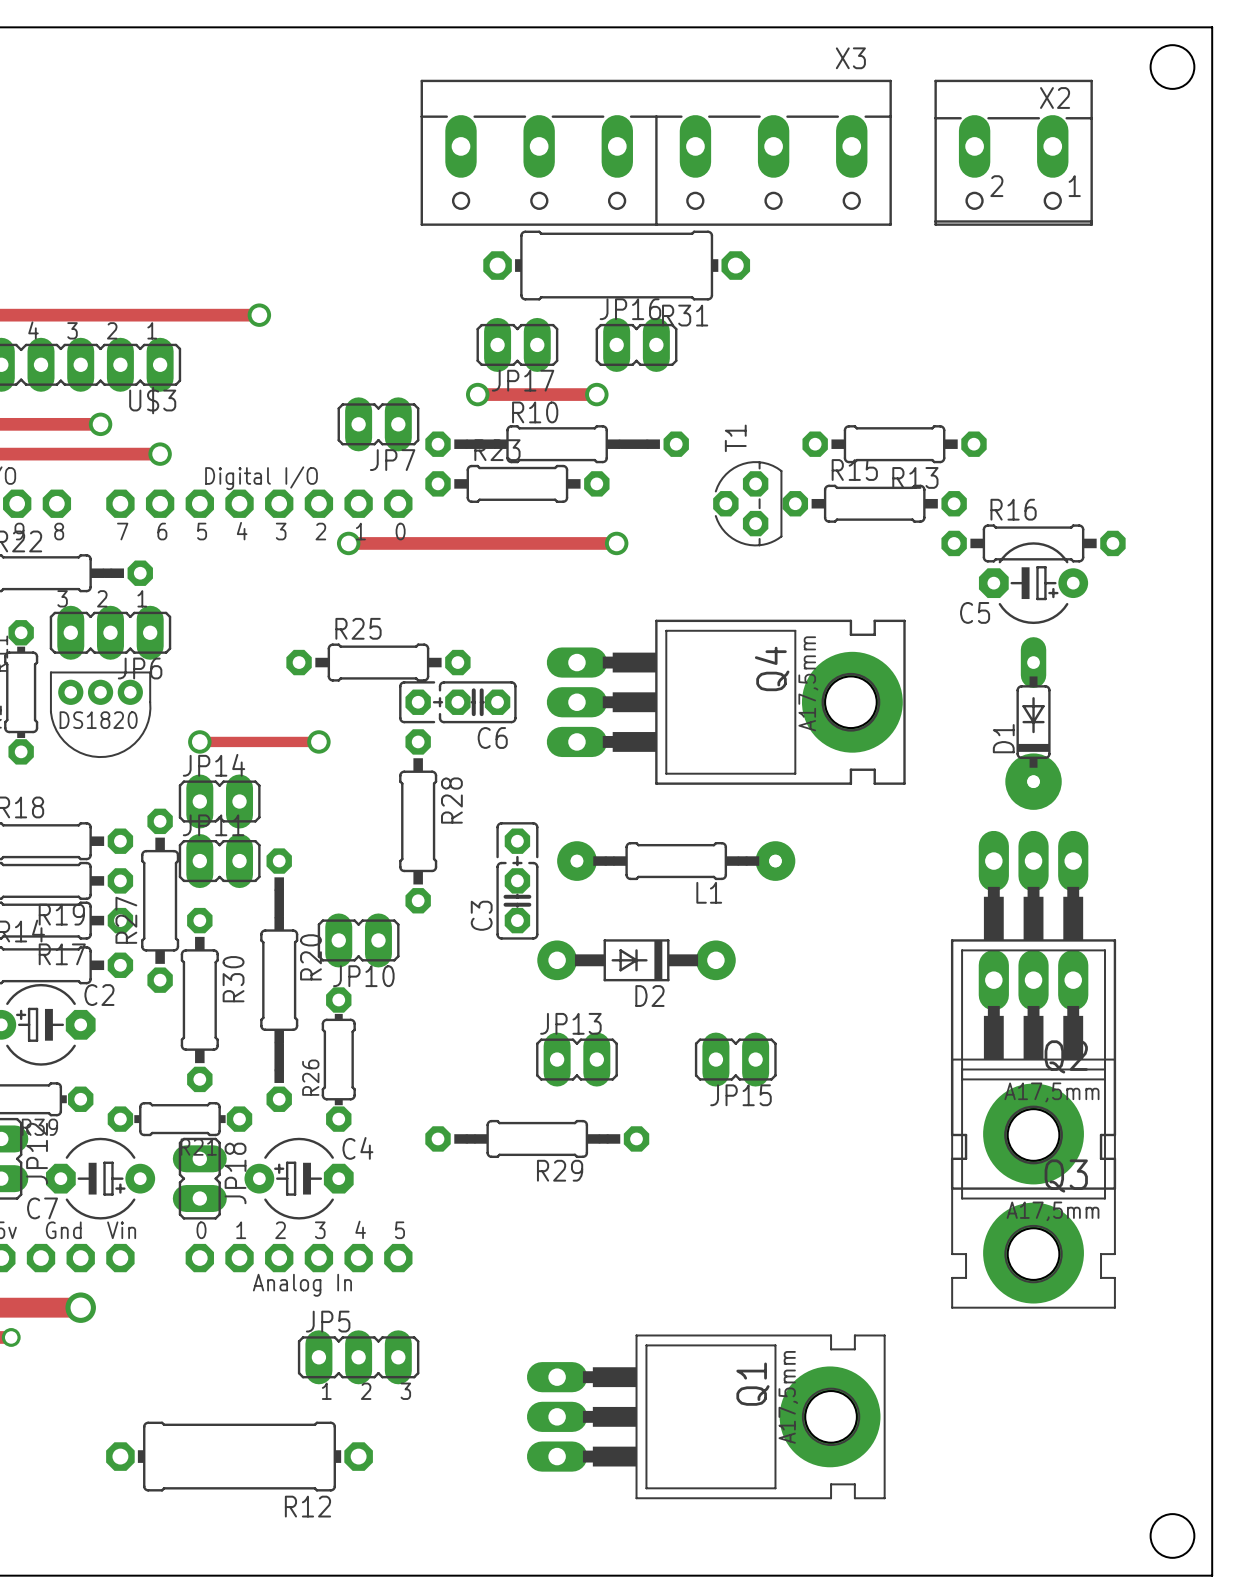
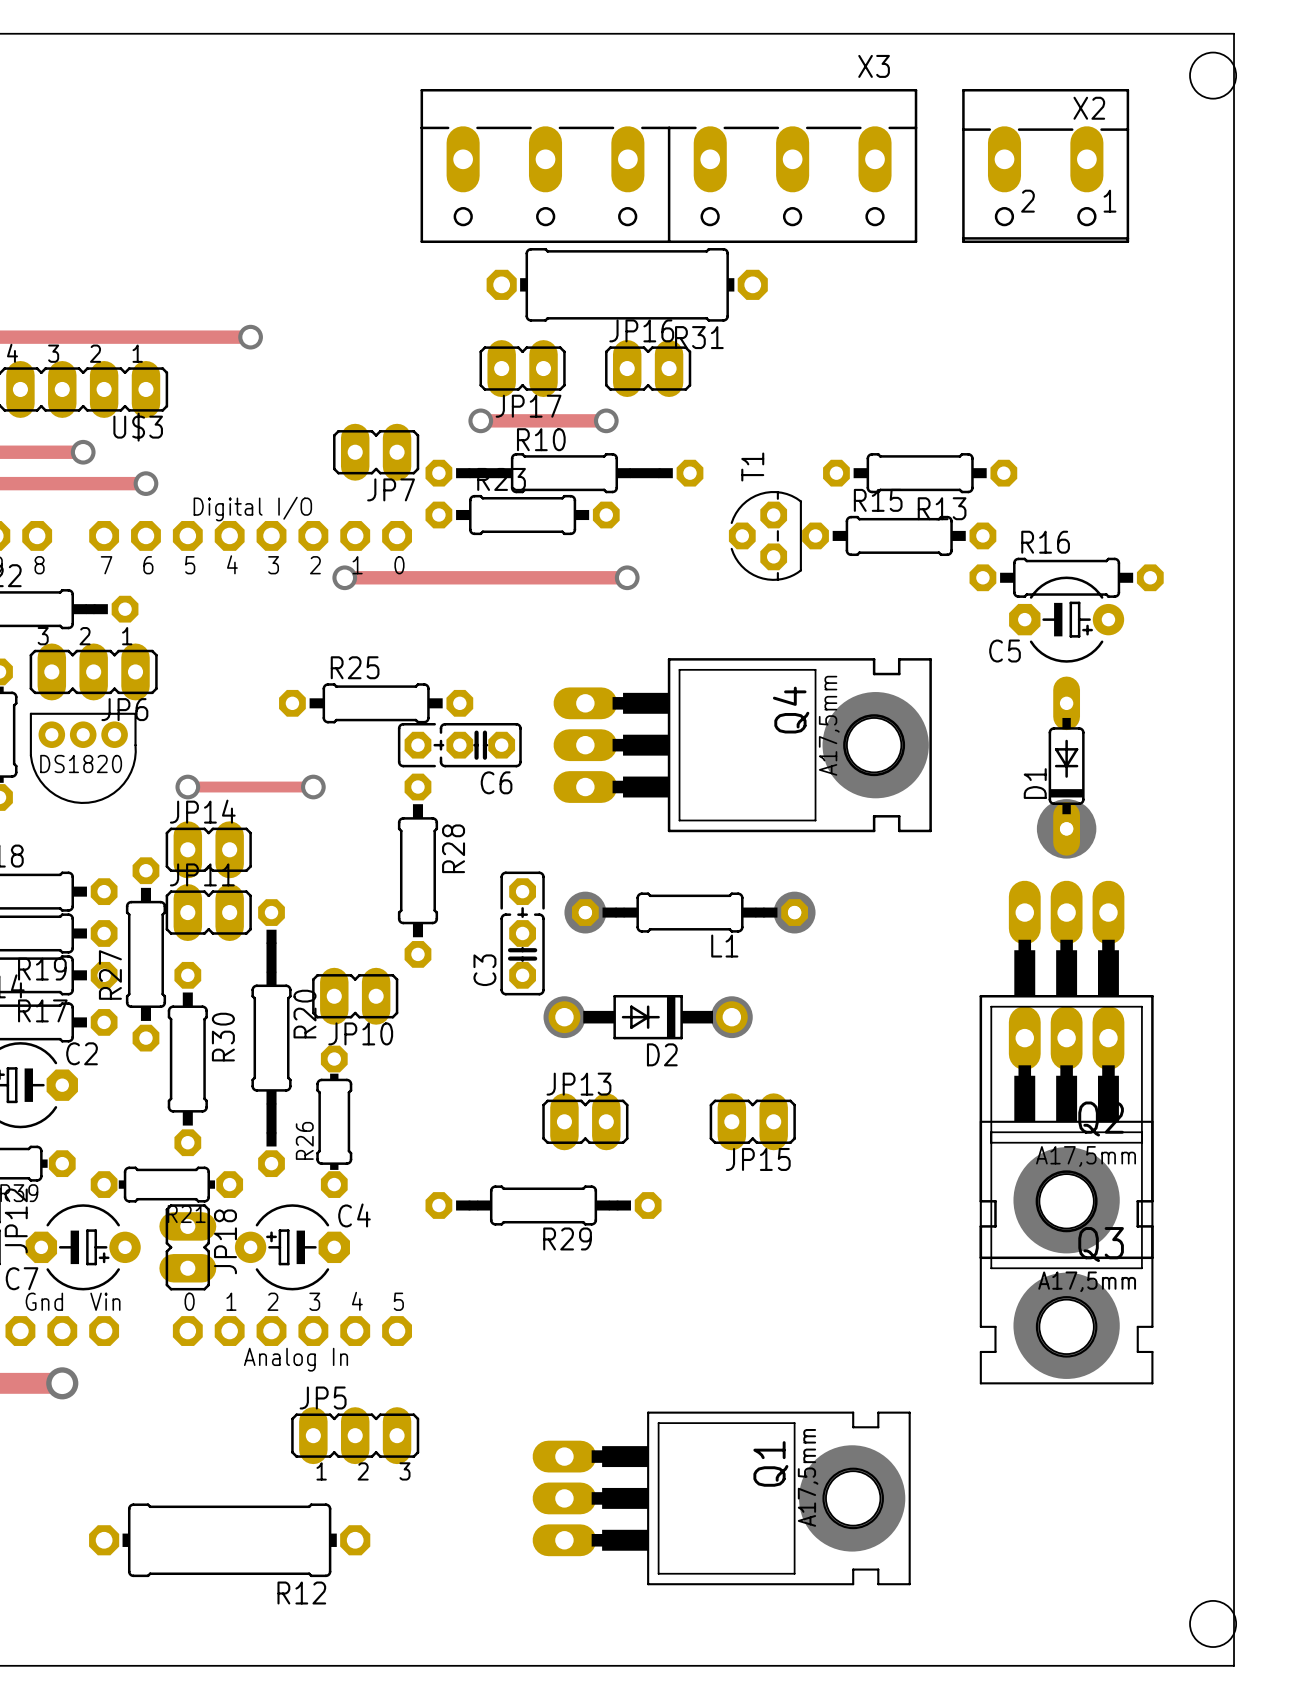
board edge: (1192, 27) (1212, 27) (1212, 1575) (1192, 1575) -> (1234, 33) (1234, 1665)

